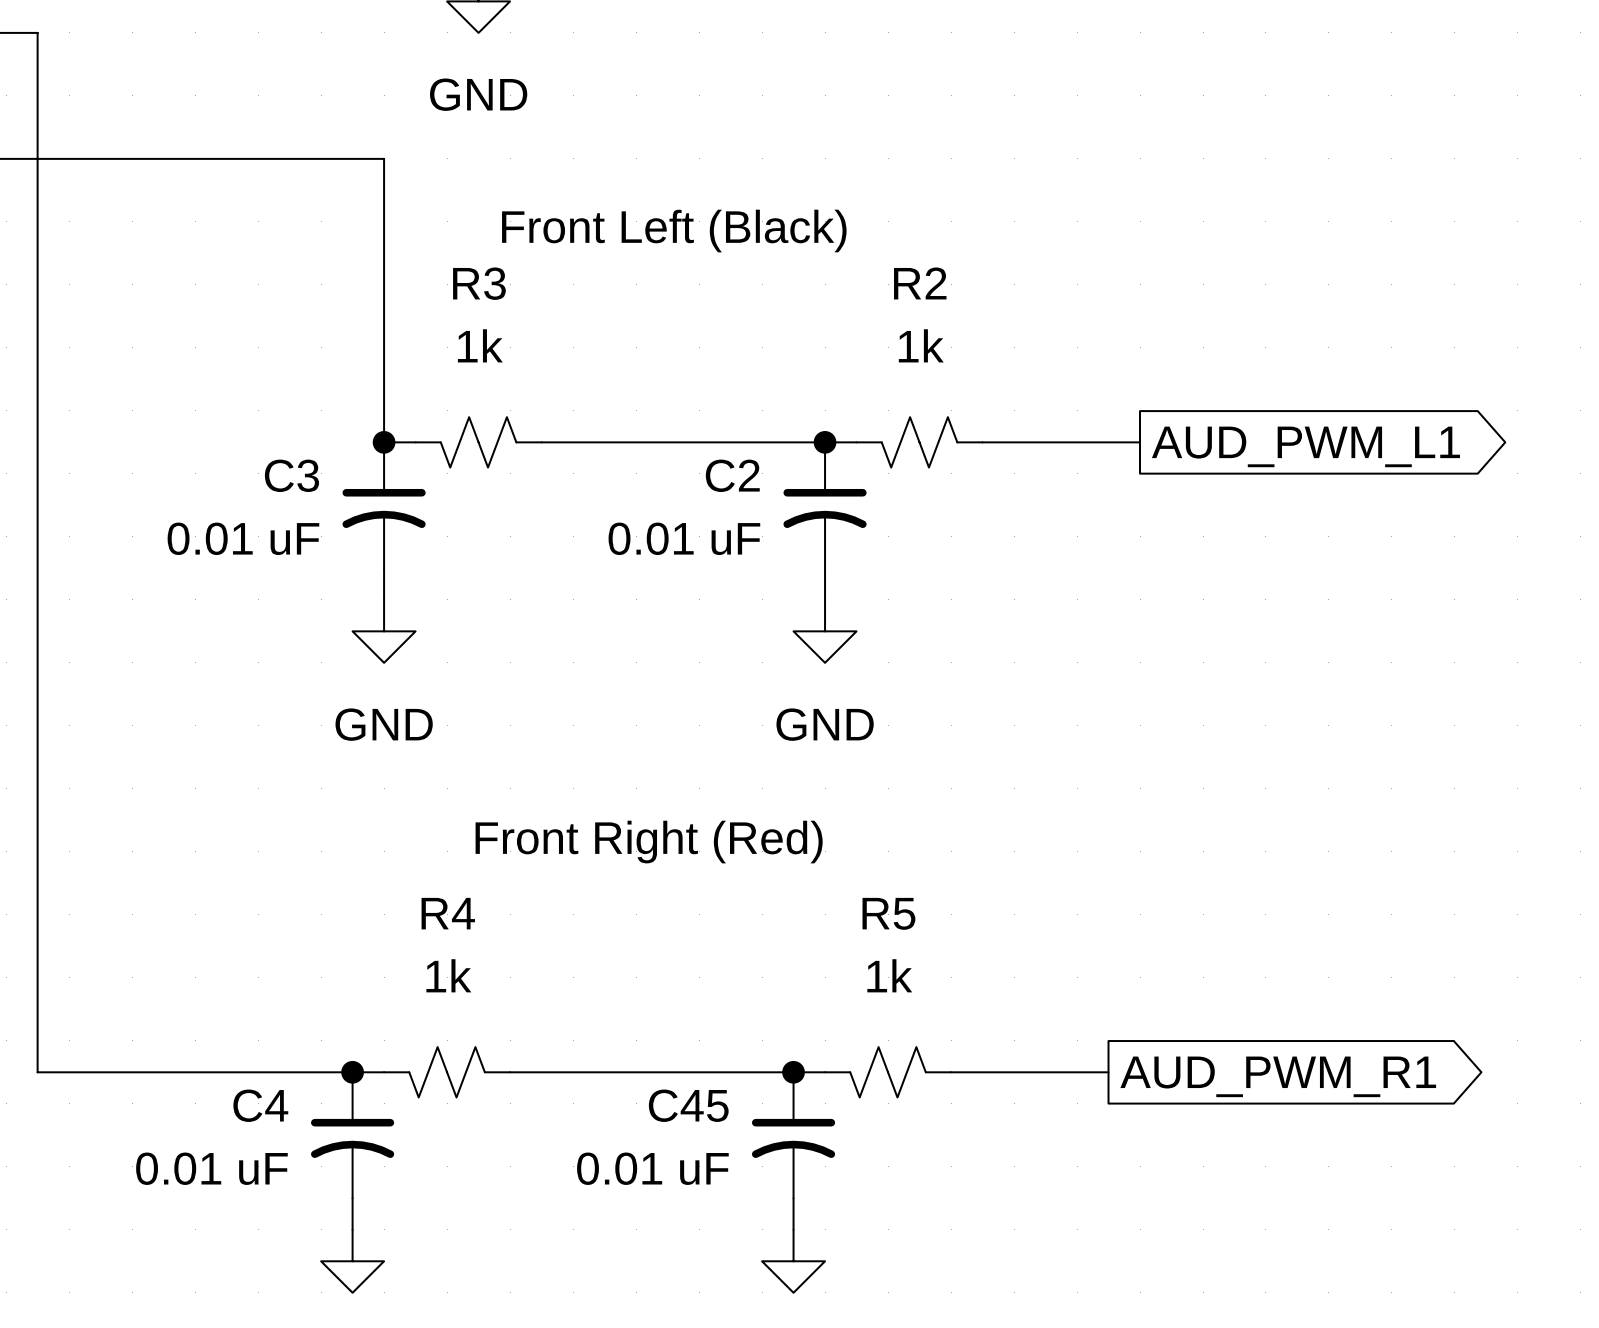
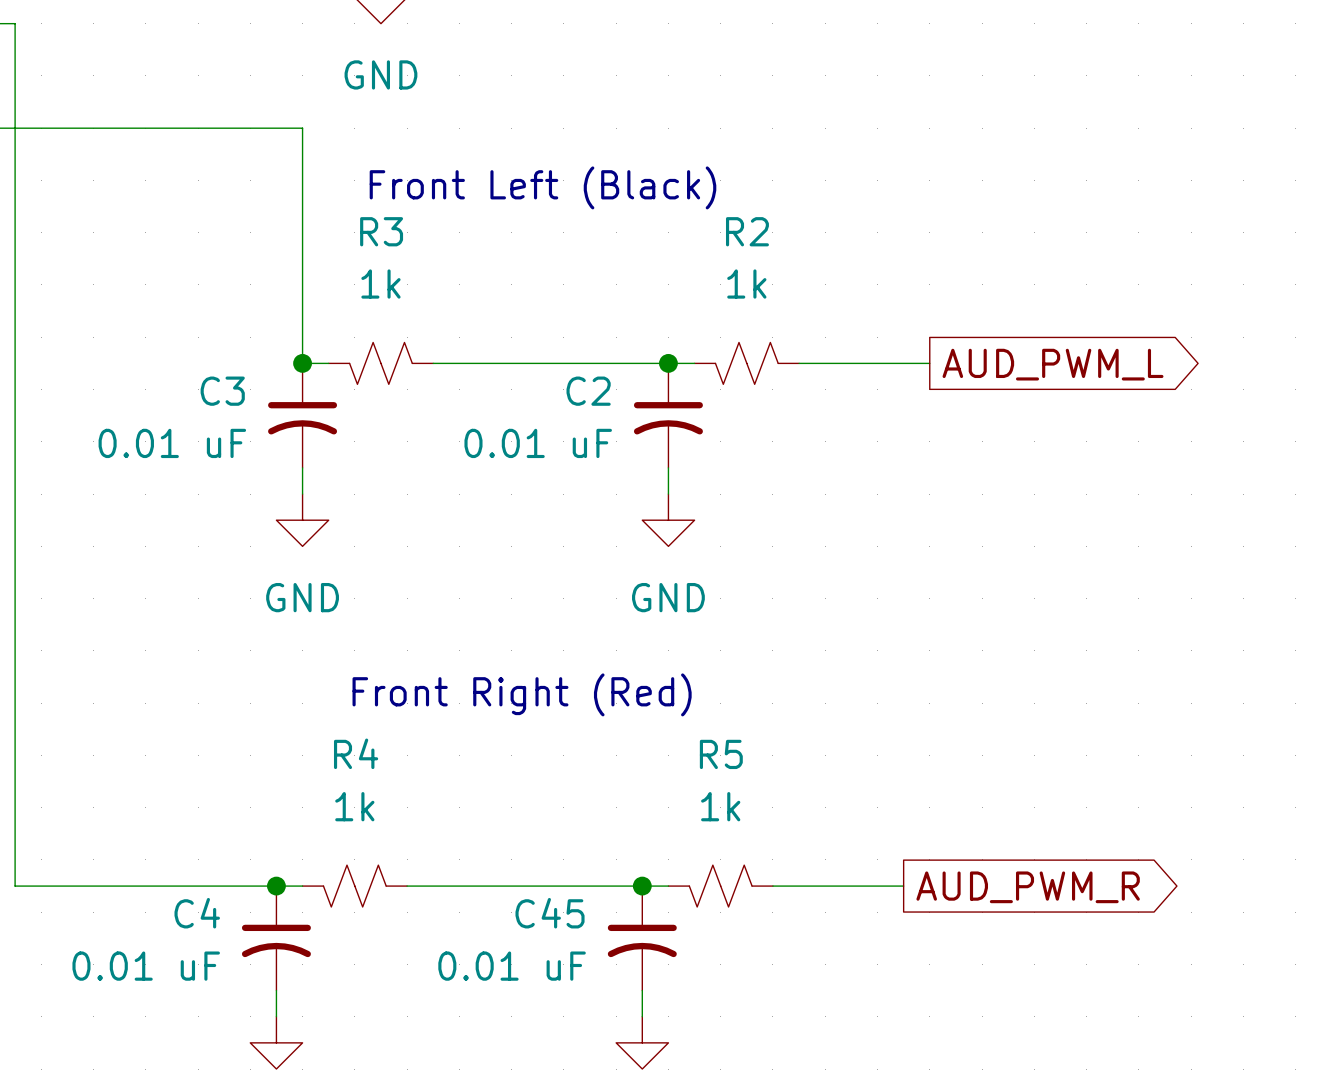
global label: AUD_PWM_L1 (1305, 446) -> AUD_PWM_L (1053, 364)
global label: AUD_PWM_R1 (1278, 1076) -> AUD_PWM_R (1028, 887)

